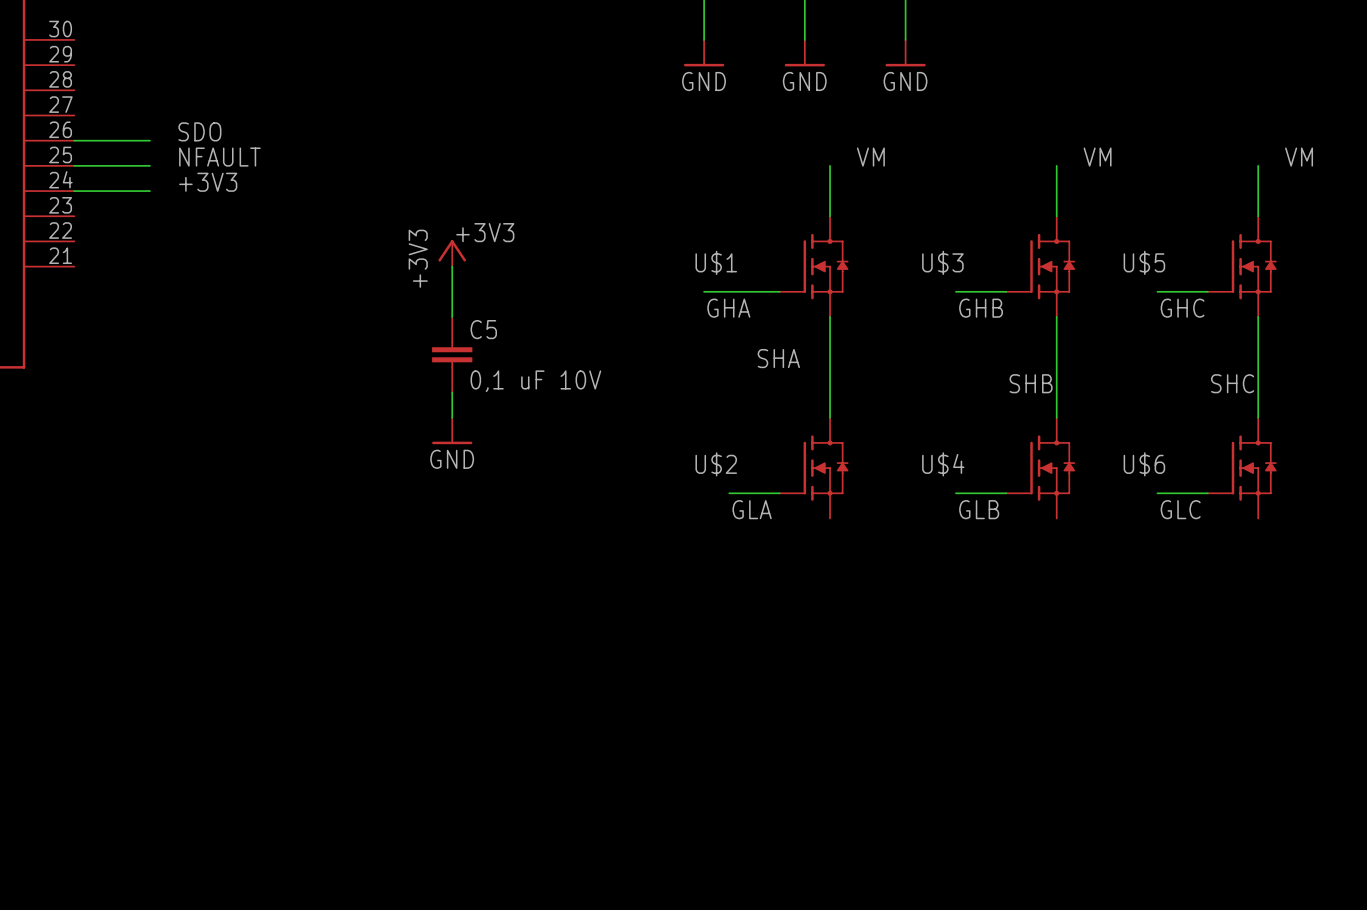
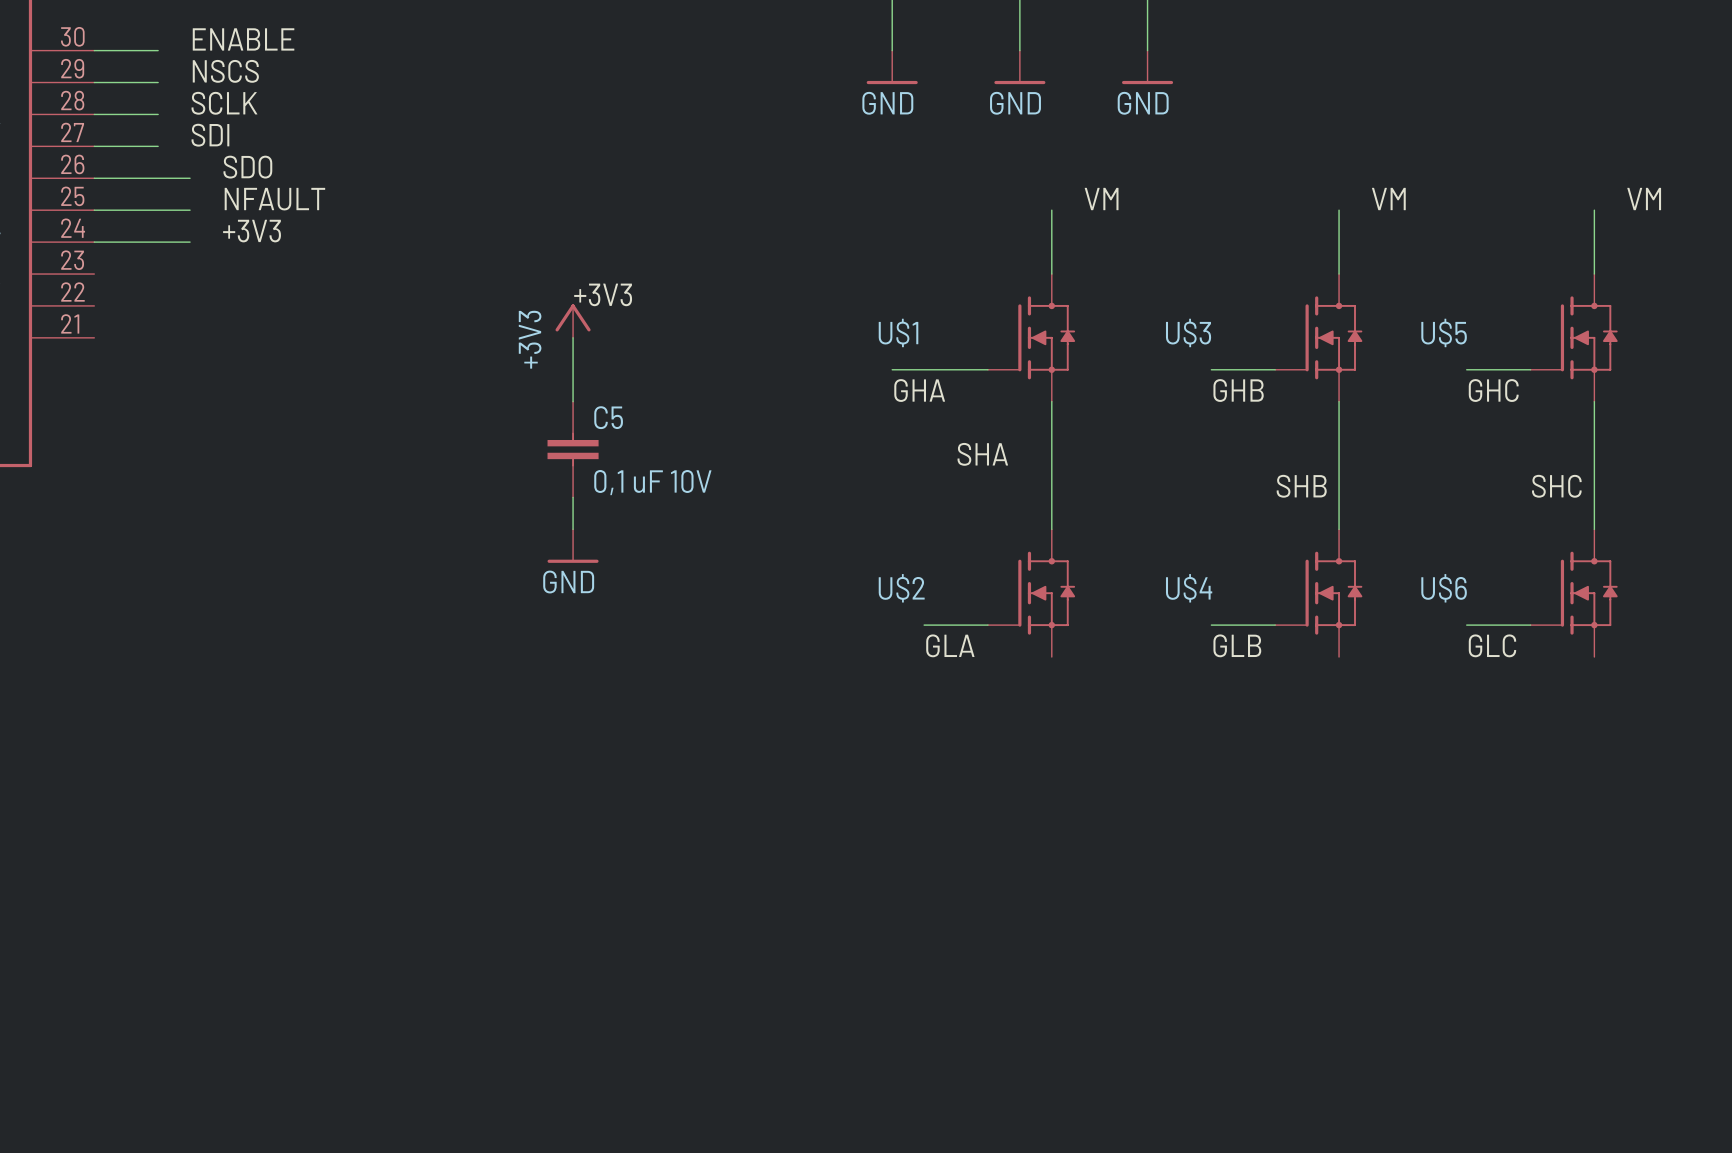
label: none -> ENABLE (243, 39)
wire: none -> (94, 50) (158, 50)
label: none -> NSCS (225, 71)
wire: none -> (94, 82) (158, 82)
label: none -> SCLK (224, 103)
wire: none -> (94, 114) (158, 114)
label: none -> SDI (210, 135)
wire: none -> (94, 146) (158, 146)

